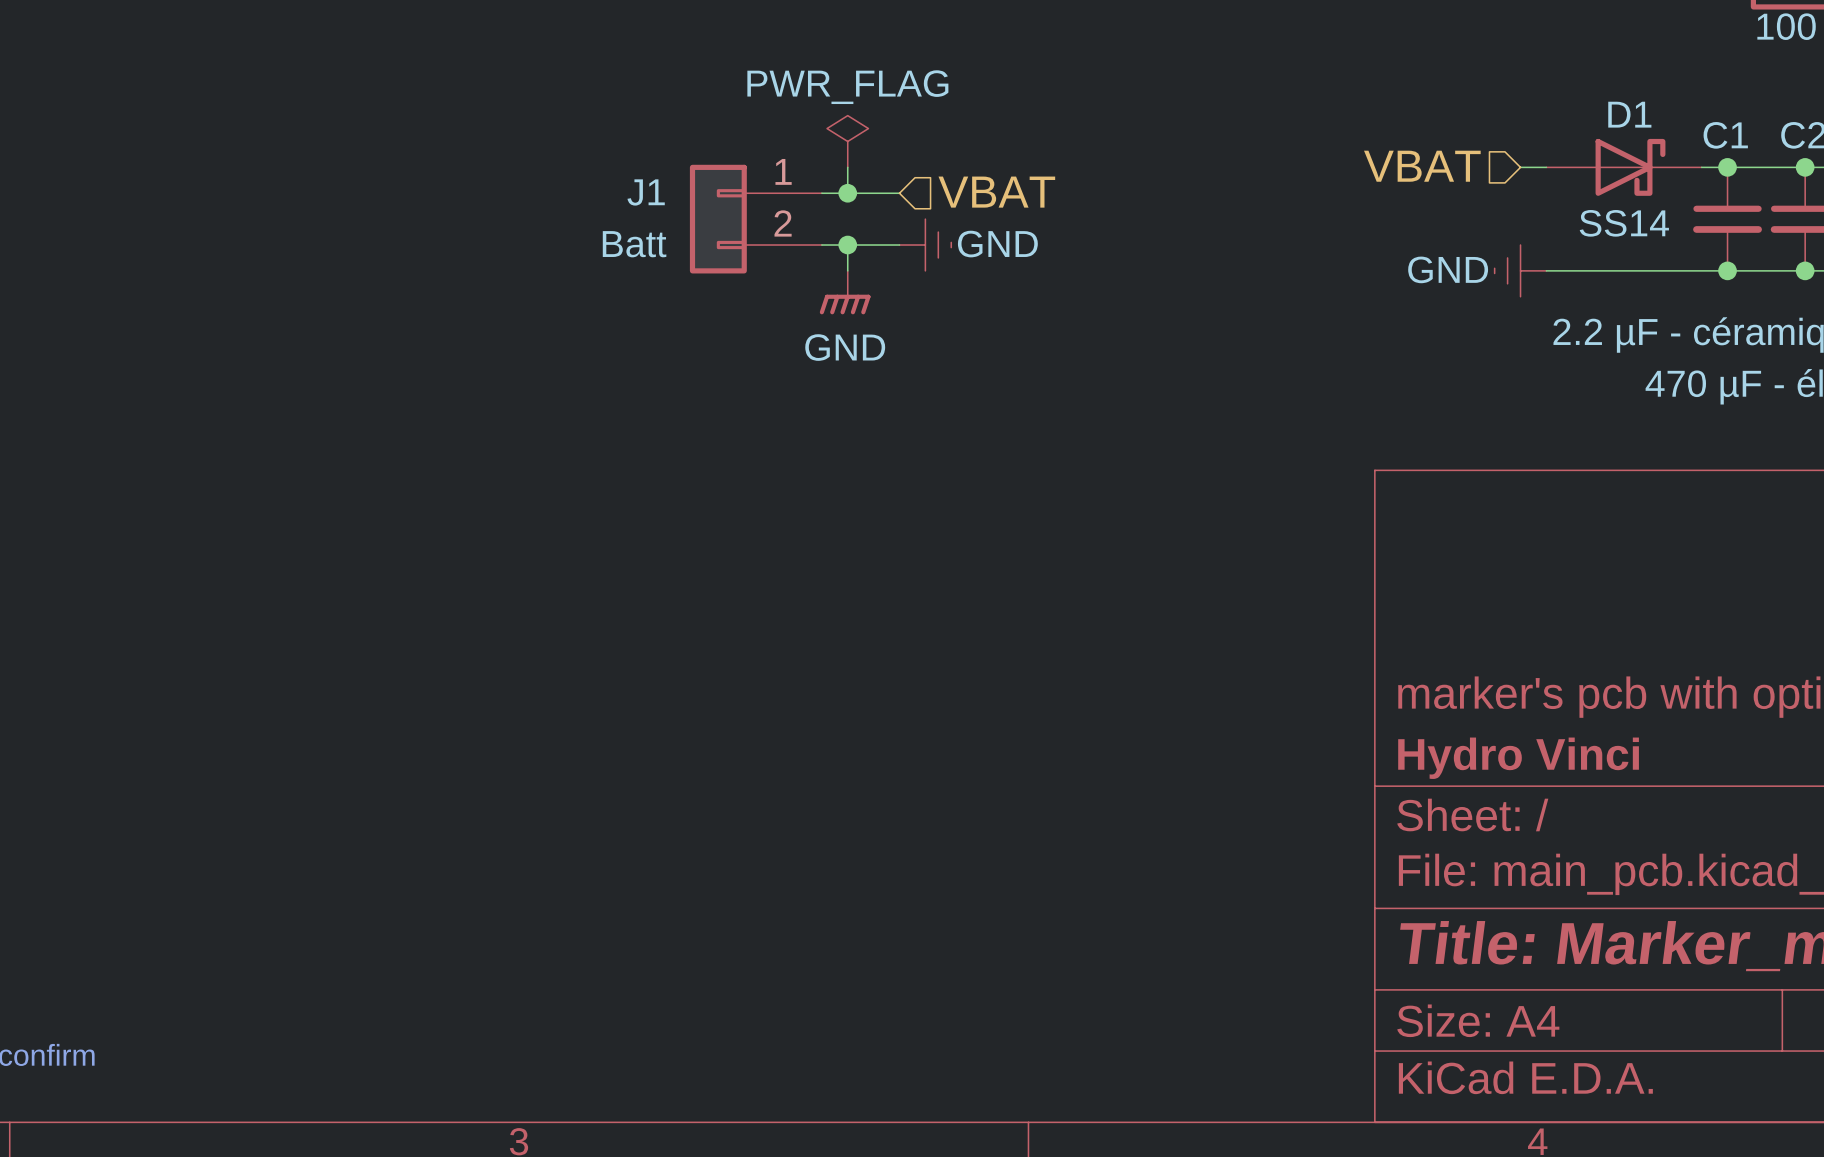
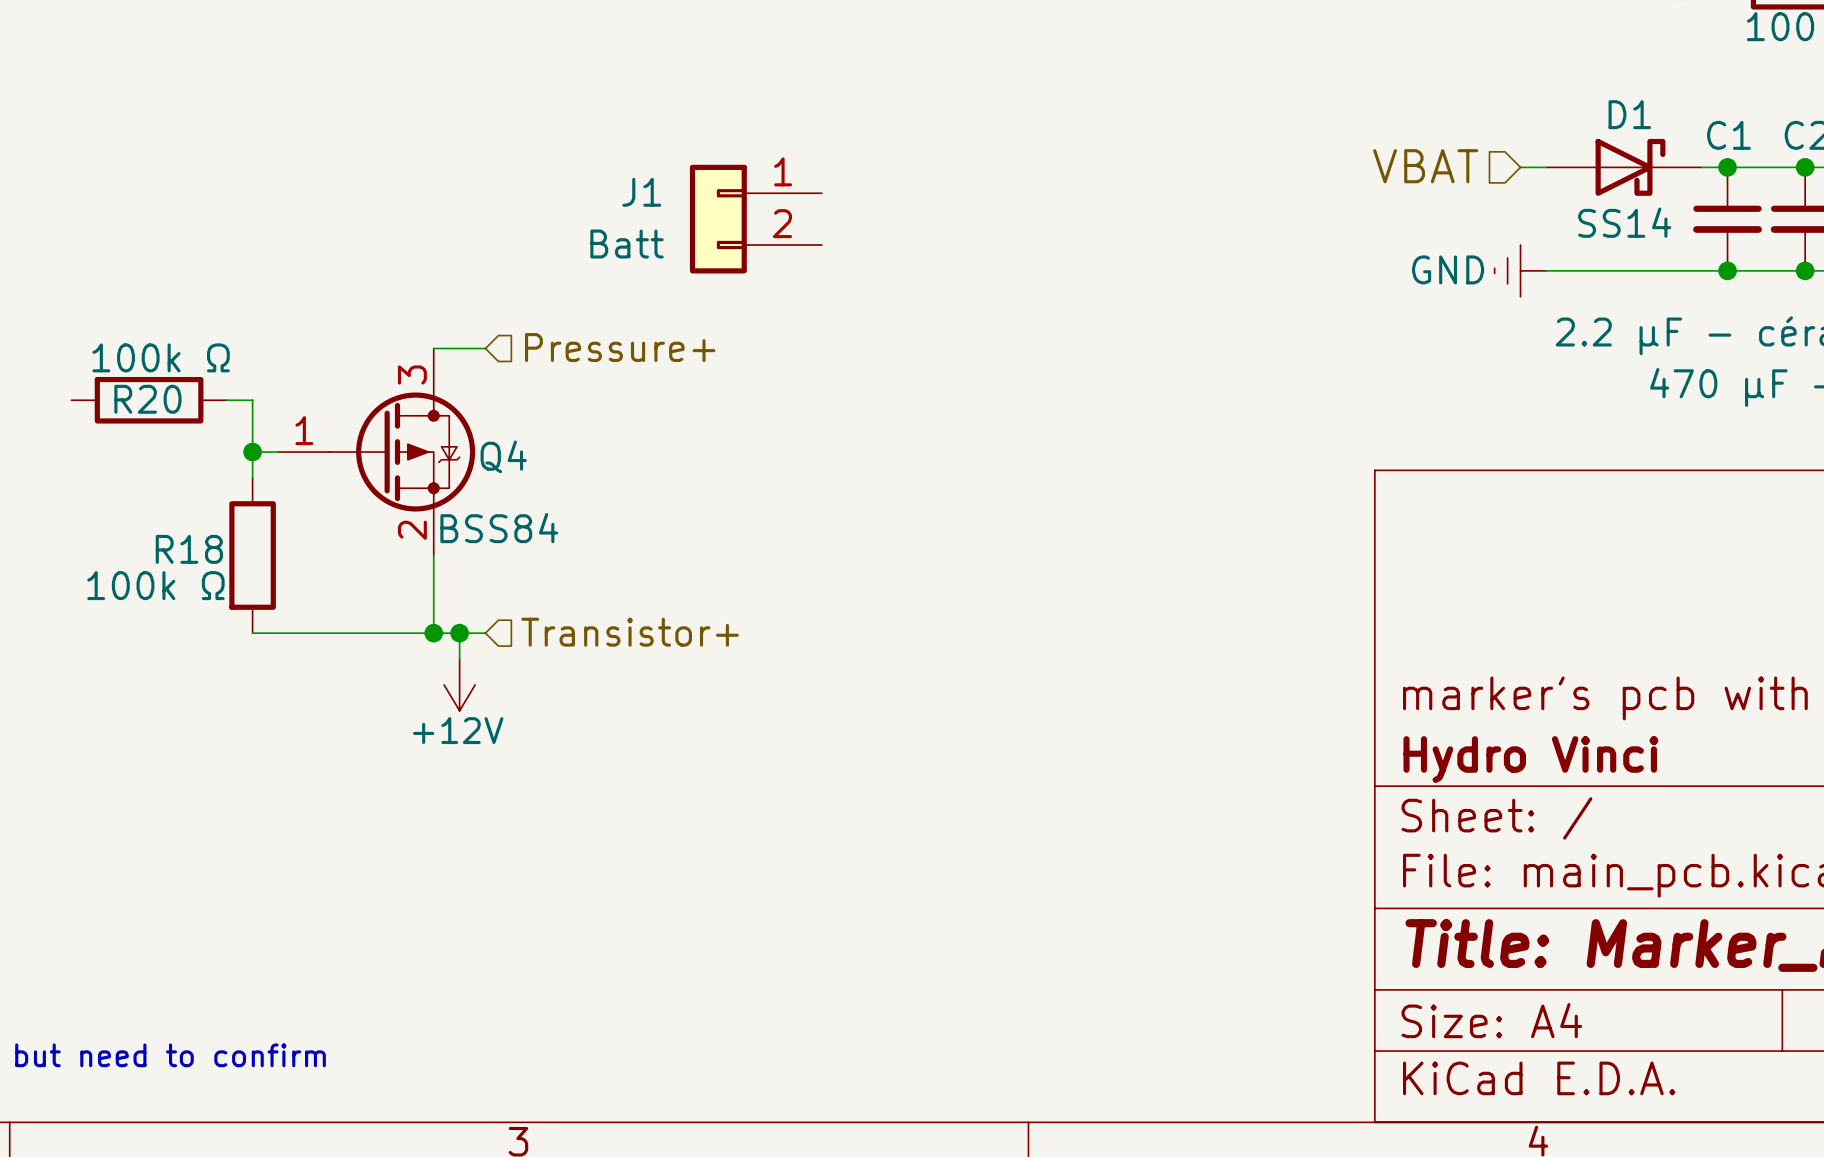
power symbol: PWR_FLAG (847, 141) -> none
wire: (847, 167) (847, 193) -> none
hierarchical label: VBAT (996, 192) -> none
wire: (821, 193) (899, 193) -> none
junction: (847, 193) -> none
wire: (821, 245) (899, 245) -> none
wire: (847, 245) (847, 270) -> none
junction: (847, 245) -> none
power symbol: GND (925, 245) -> none
power symbol: GND (845, 292) -> none
hierarchical label: none -> Pressure+ (620, 347)
wire: none -> (433, 348) (485, 348)
R20: none -> 100k Ω (149, 400)
wire: none -> (226, 400) (252, 400) (252, 477)
wire: none -> (252, 452) (278, 452)
junction: none -> (252, 452)
Q4: none -> BSS84 (376, 452)
R18: none -> 100k Ω (252, 555)
wire: none -> (433, 555) (433, 633)
hierarchical label: none -> Transistor+ (630, 632)
wire: none -> (252, 633) (485, 633)
junction: none -> (433, 633)
wire: none -> (459, 633) (459, 659)
junction: none -> (459, 633)
power symbol: none -> +12V (459, 684)

